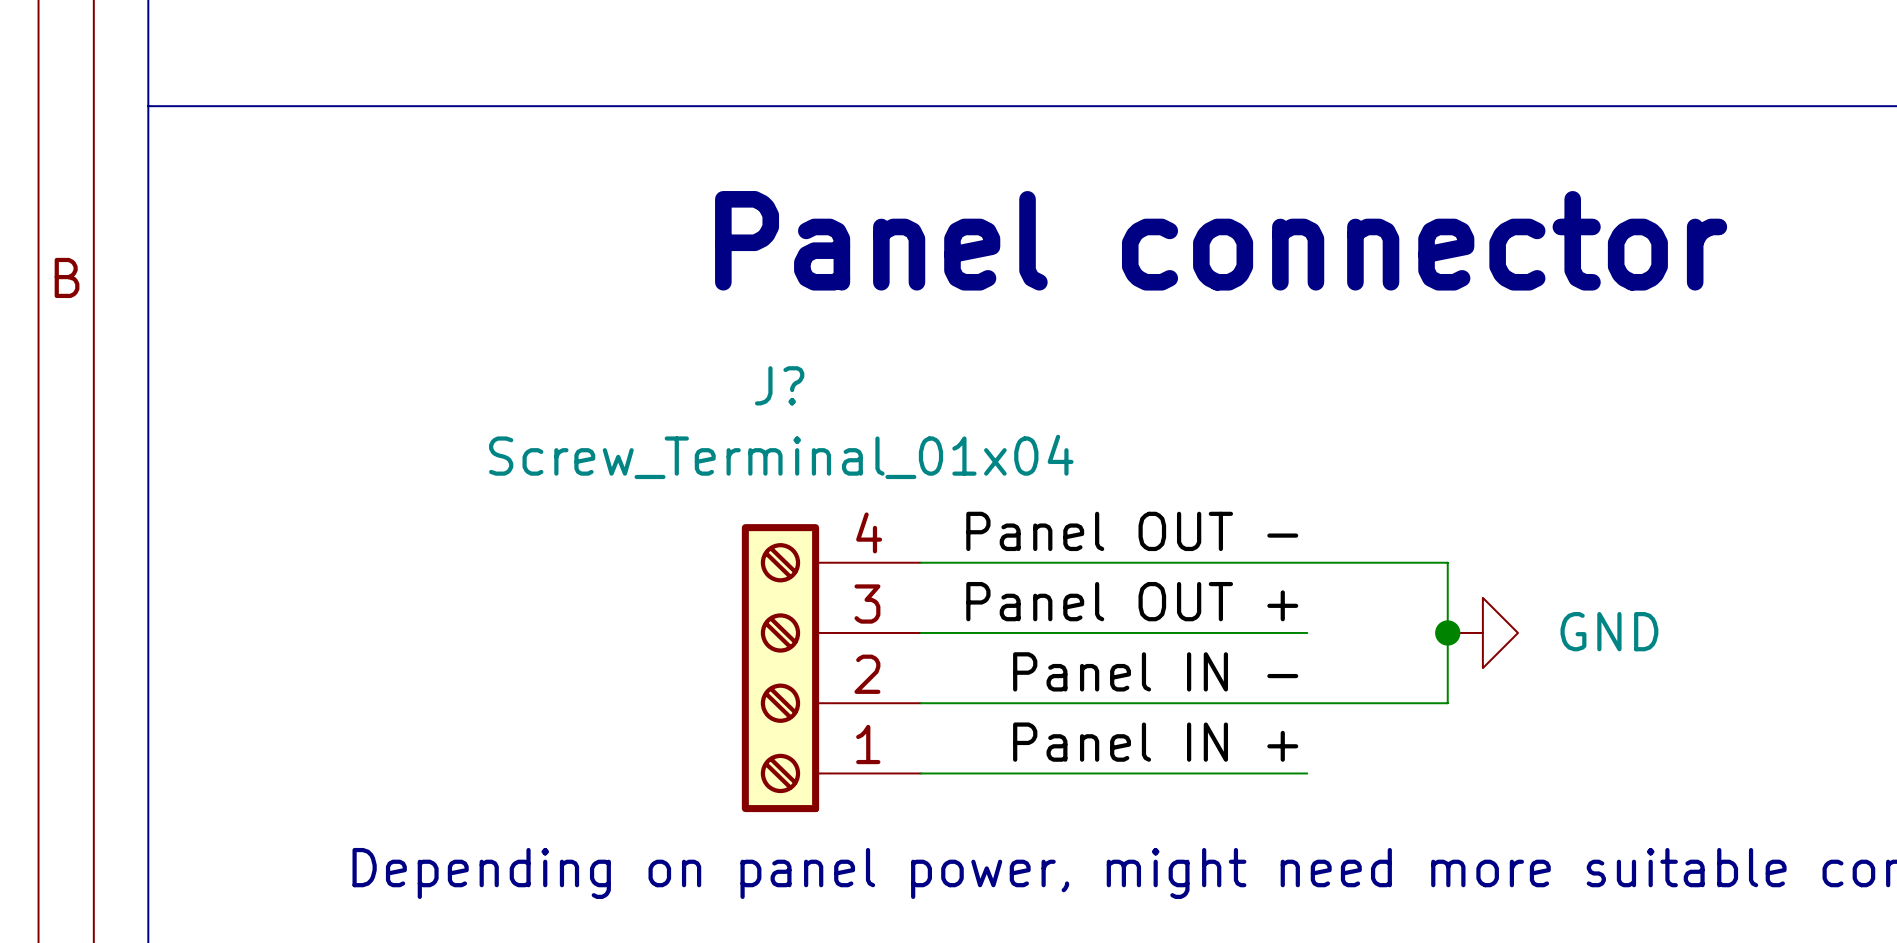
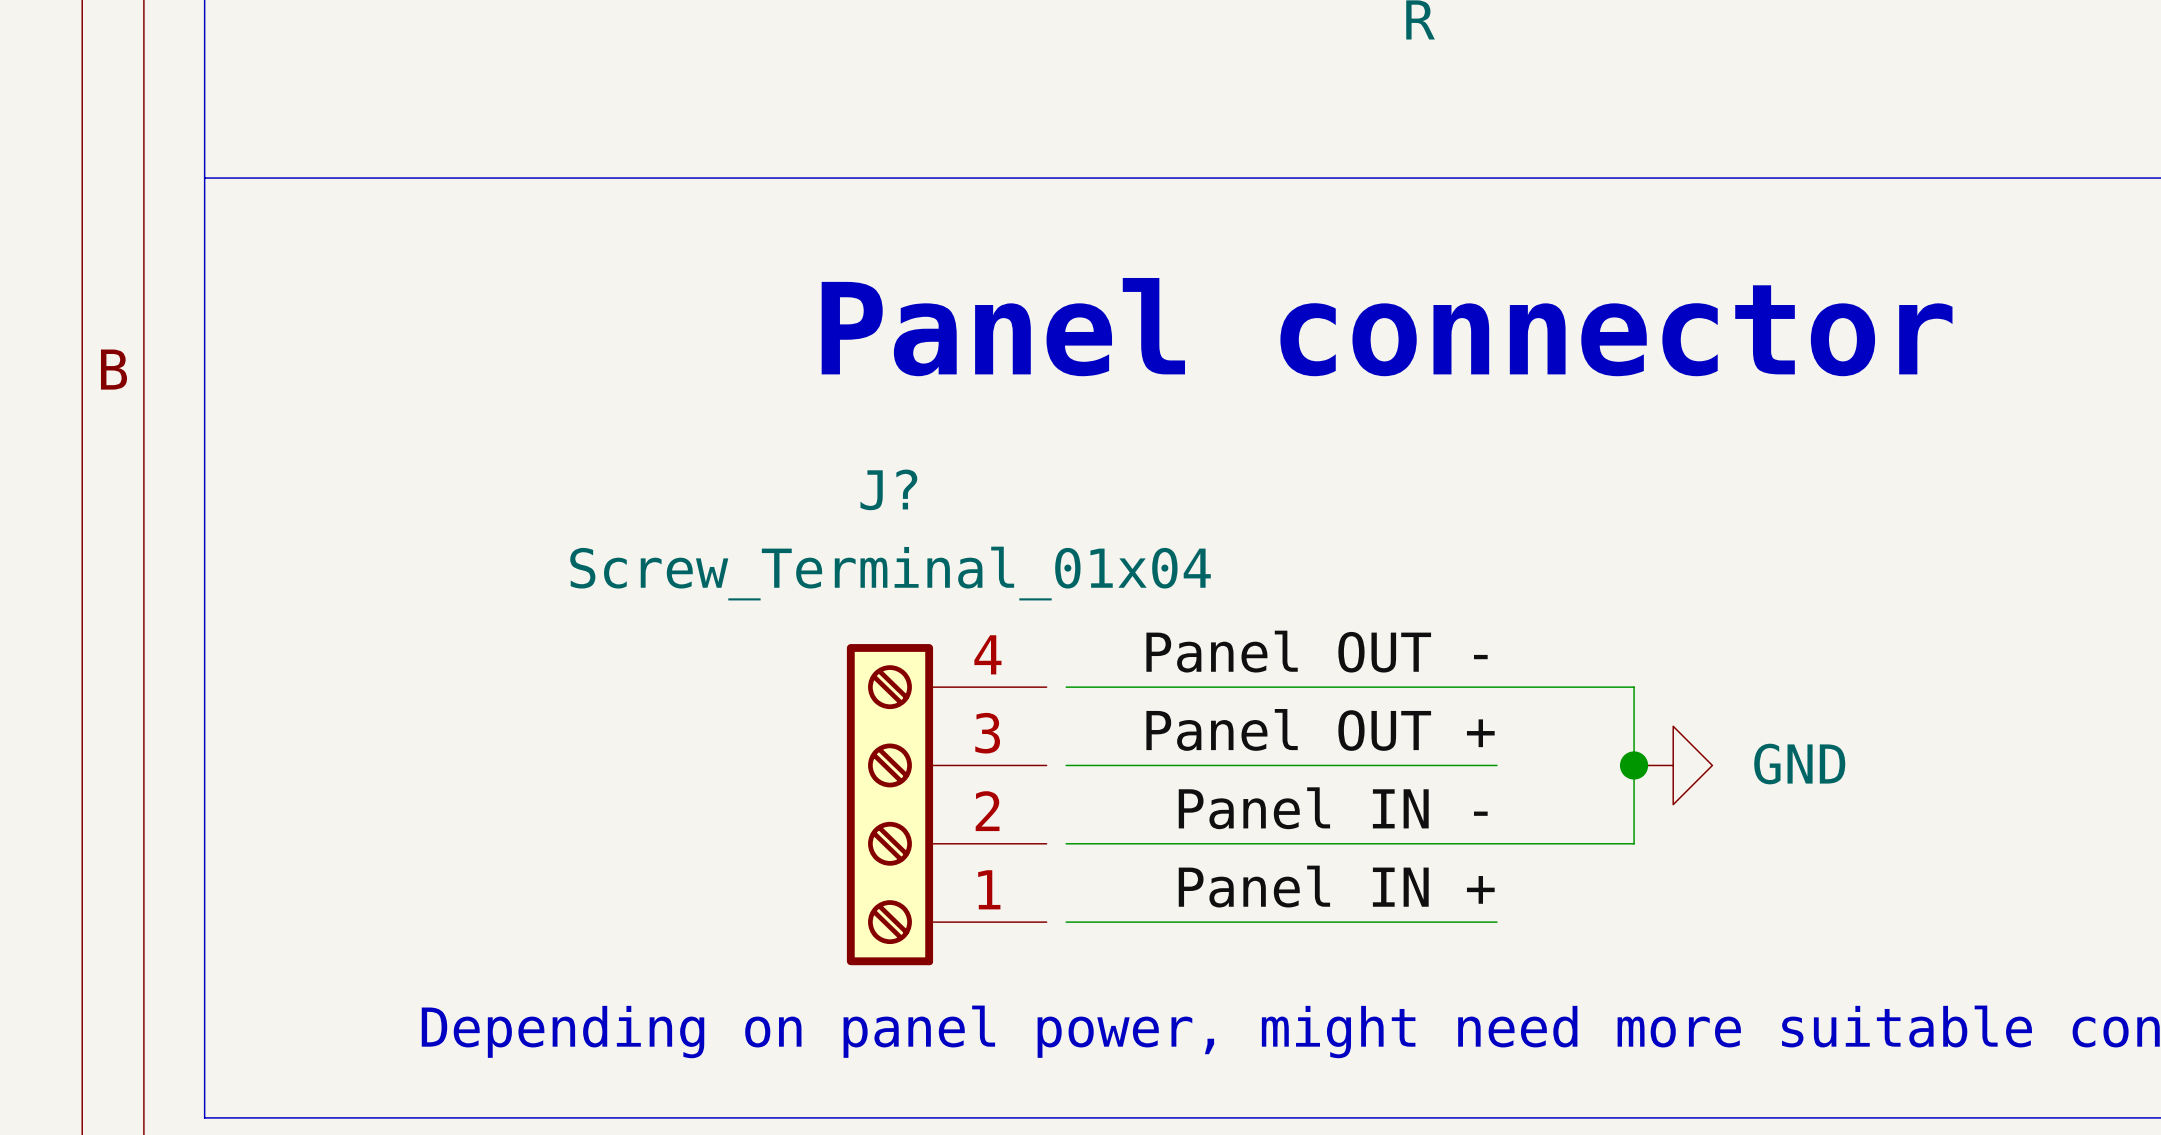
wire: (1430, 562) (1447, 562) (1447, 703) (1430, 703) -> (1634, 687) (1634, 843)
junction position: (1447, 632) -> (1634, 765)
power symbol position: GND (1482, 632) -> GND (1673, 765)
J? position: (831, 668) -> (946, 804)

